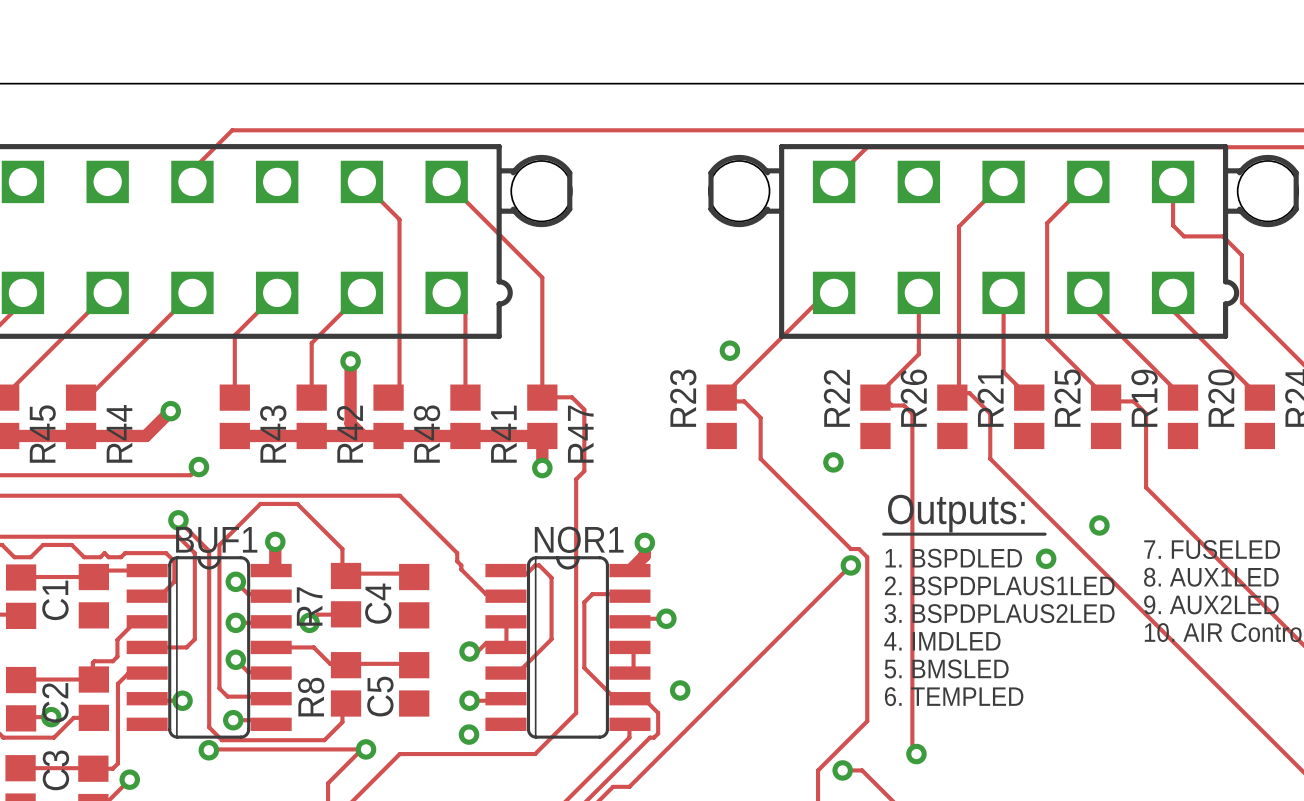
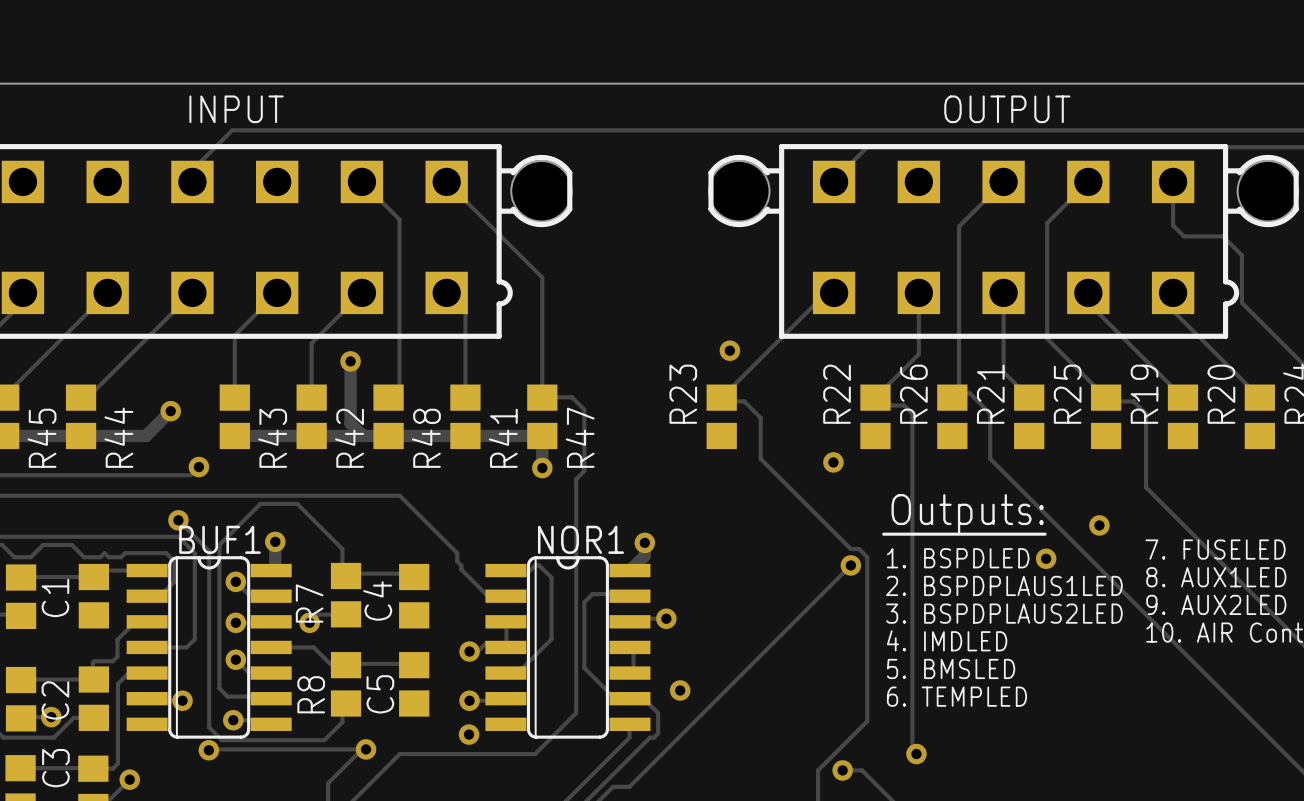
INPUT name: none -> INPUT (236, 109)
OUTPUT name: none -> OUTPUT (1007, 109)

